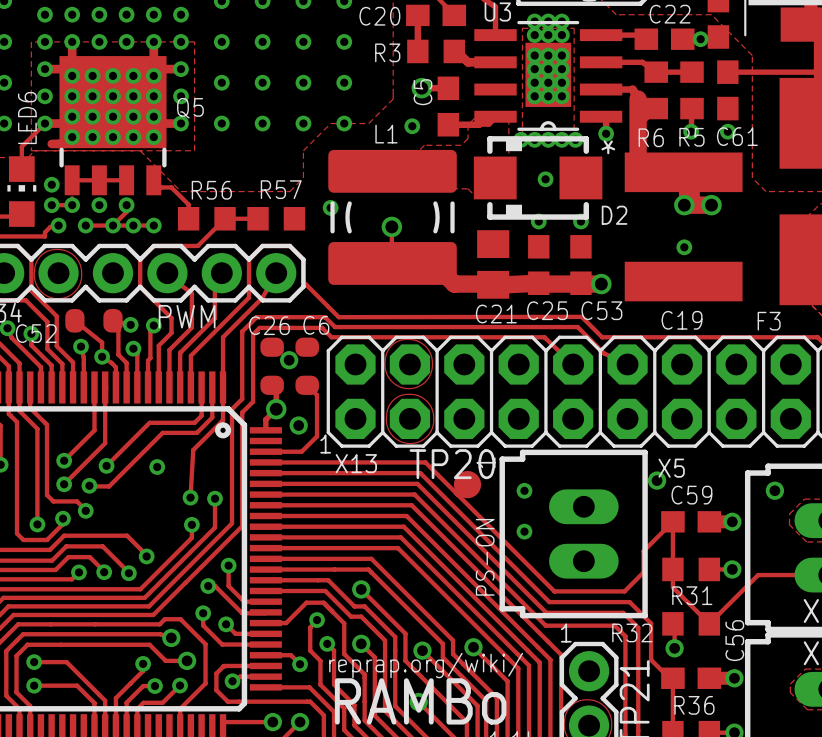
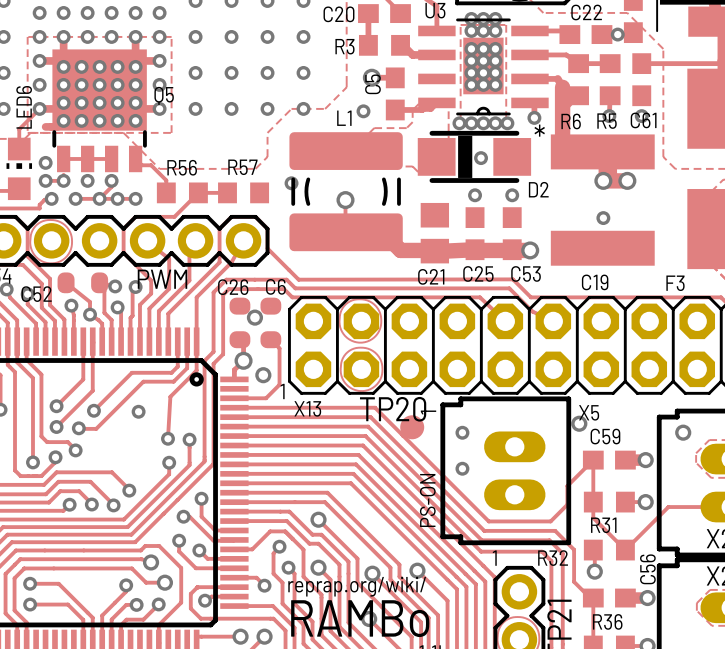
D2 footprint: [473, 136, 603, 220] -> [417, 130, 532, 183]

